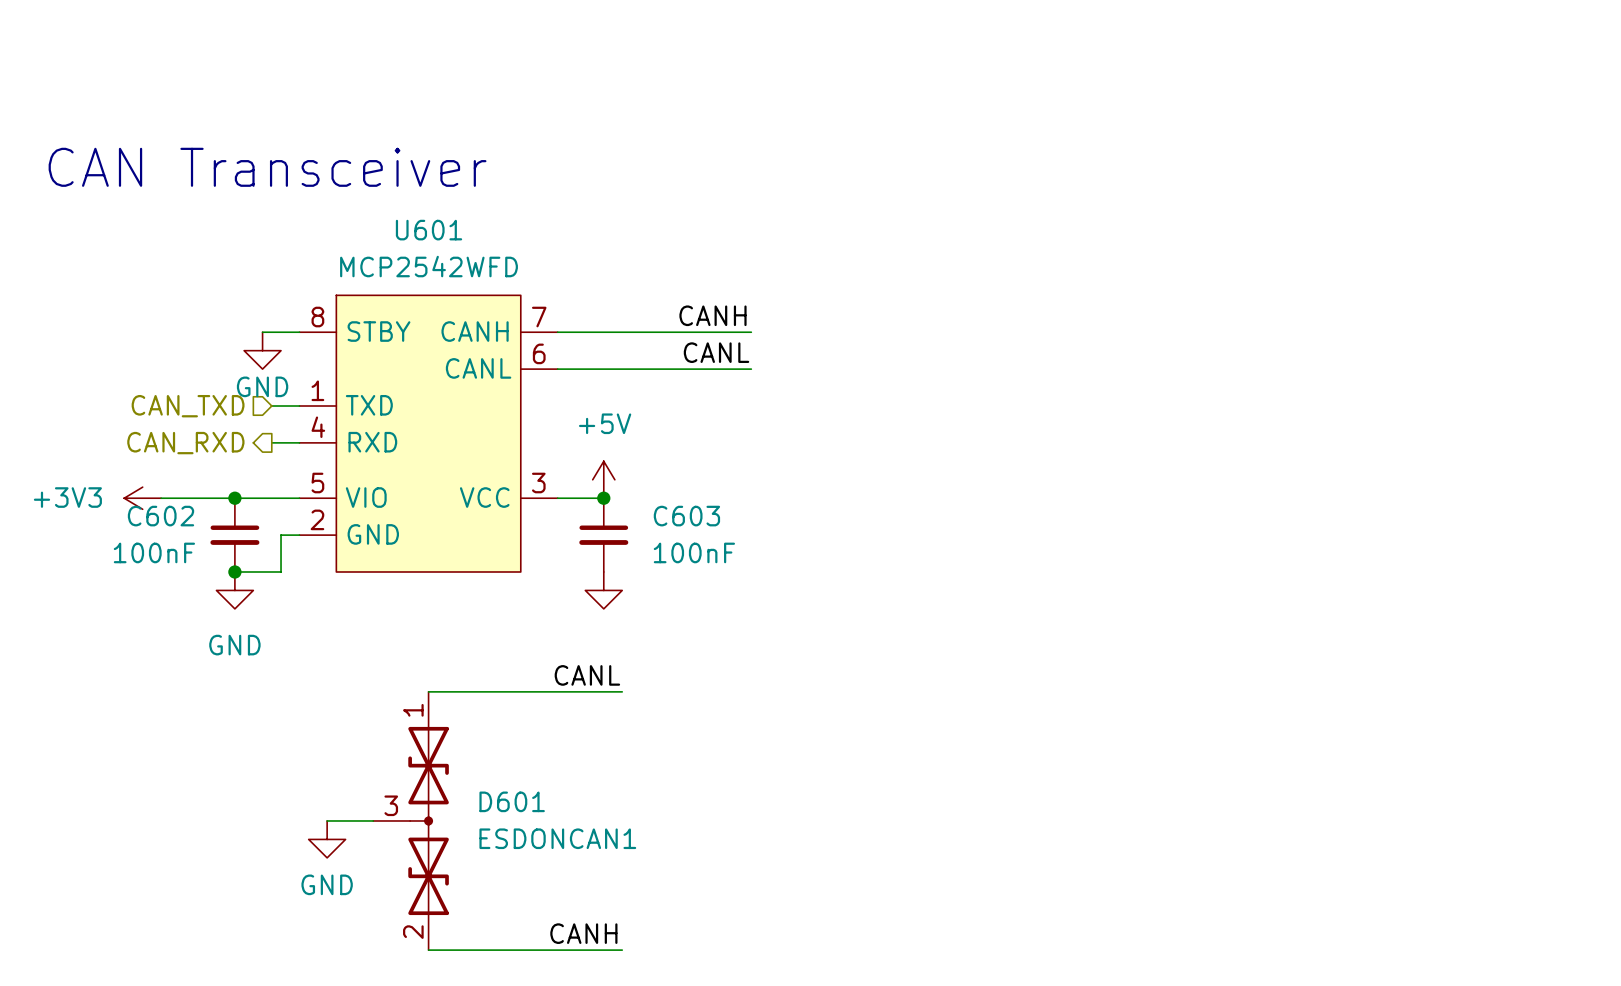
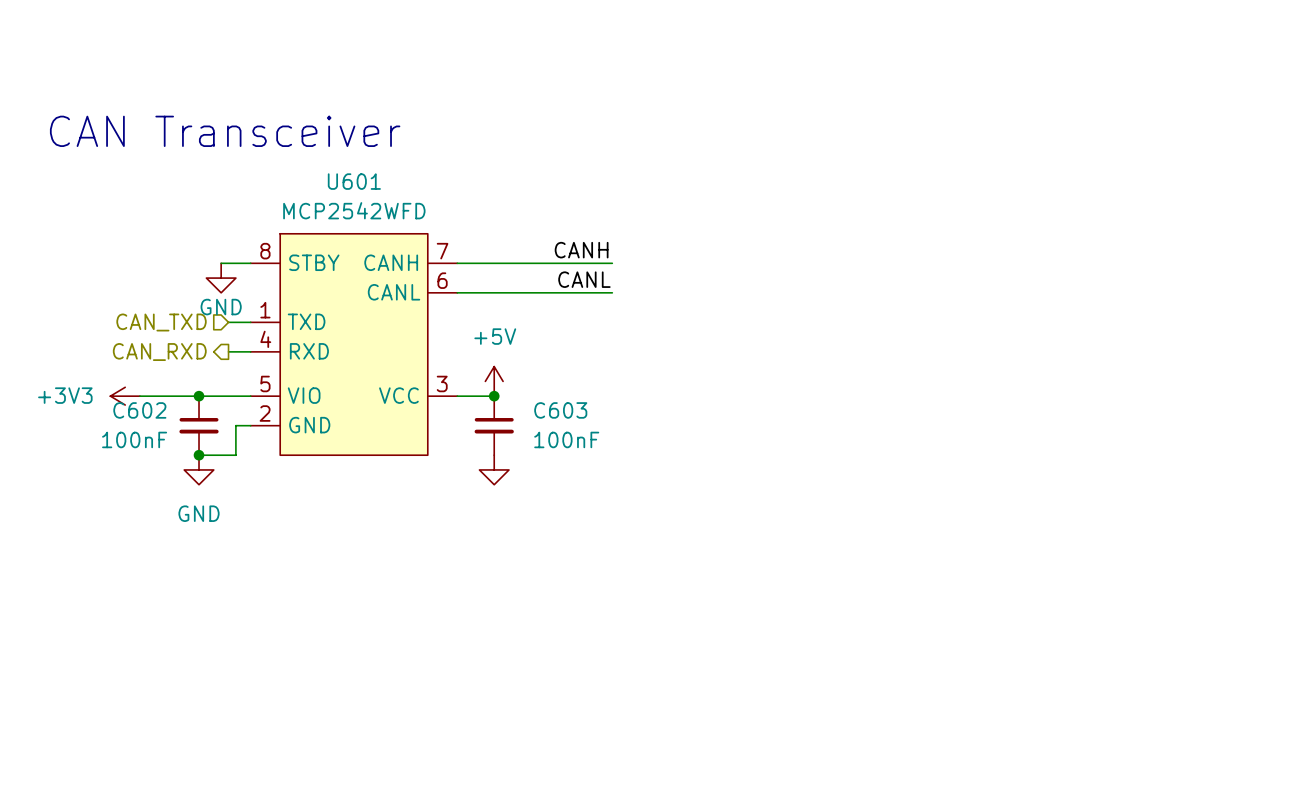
label: CANL (587, 675) -> none
wire: (428, 691) (622, 691) -> none
wire: (327, 820) (373, 820) -> none
D601: ESDONCAN1 (411, 820) -> none
power symbol: GND (327, 839) -> none
label: CANH (583, 933) -> none
wire: (428, 950) (622, 950) -> none

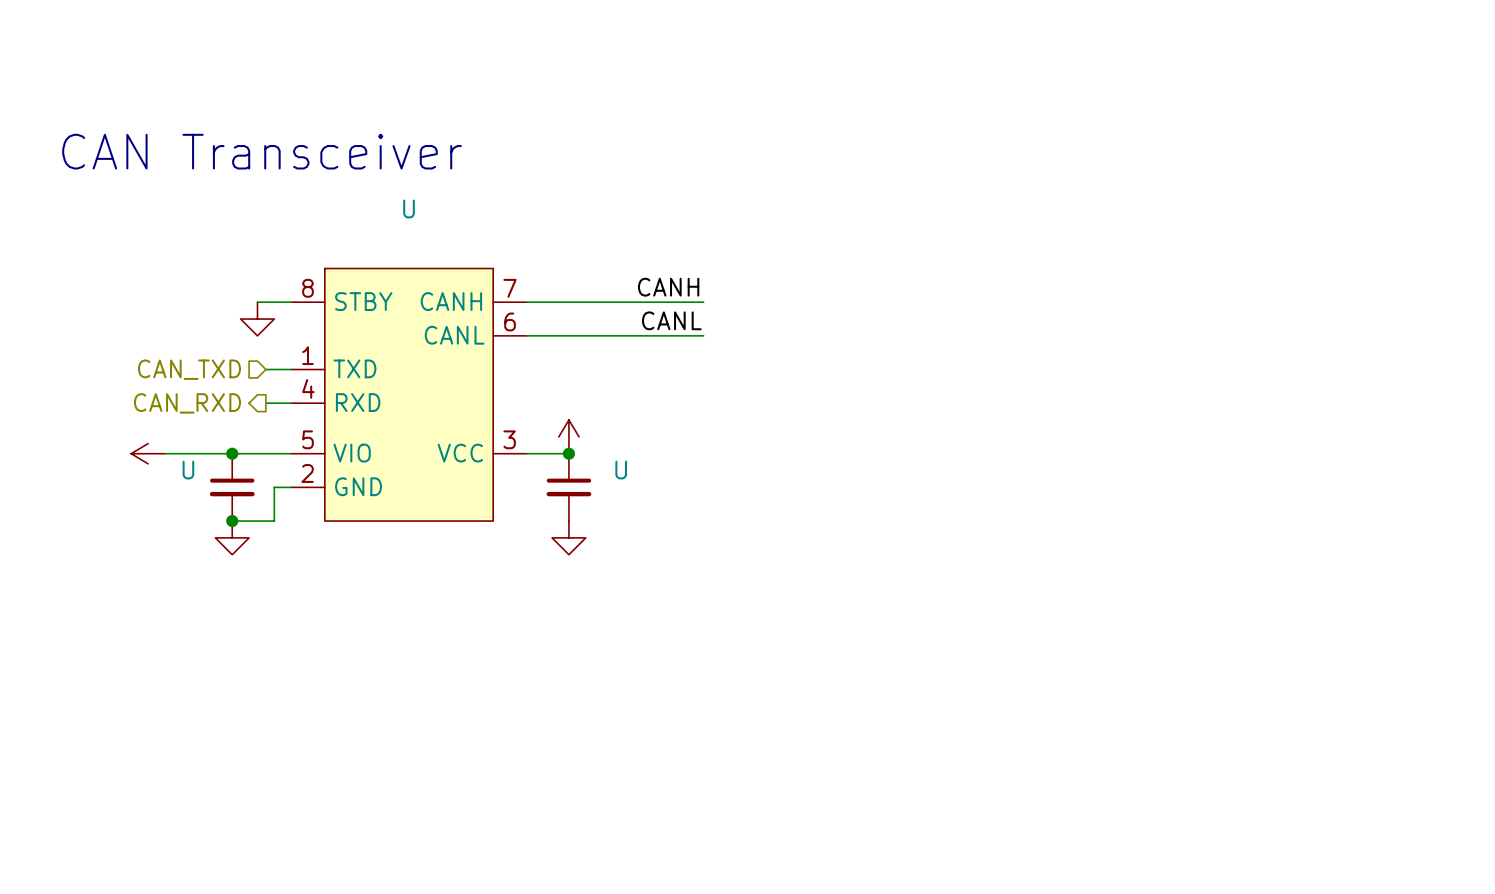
U601 name: U601 (354, 181) -> U (409, 208)
U601 value: MCP2542WFD (354, 210) -> none
power symbol text: GND (221, 307) -> none
power symbol text: +5V (495, 336) -> none
power symbol text: +3V3 (65, 395) -> none
C602 name: C602 (139, 410) -> U (188, 469)
C603 name: C603 (560, 410) -> U (621, 469)
C602 value: 100nF (134, 439) -> none
C603 value: 100nF (566, 439) -> none
power symbol text: GND (199, 513) -> none

